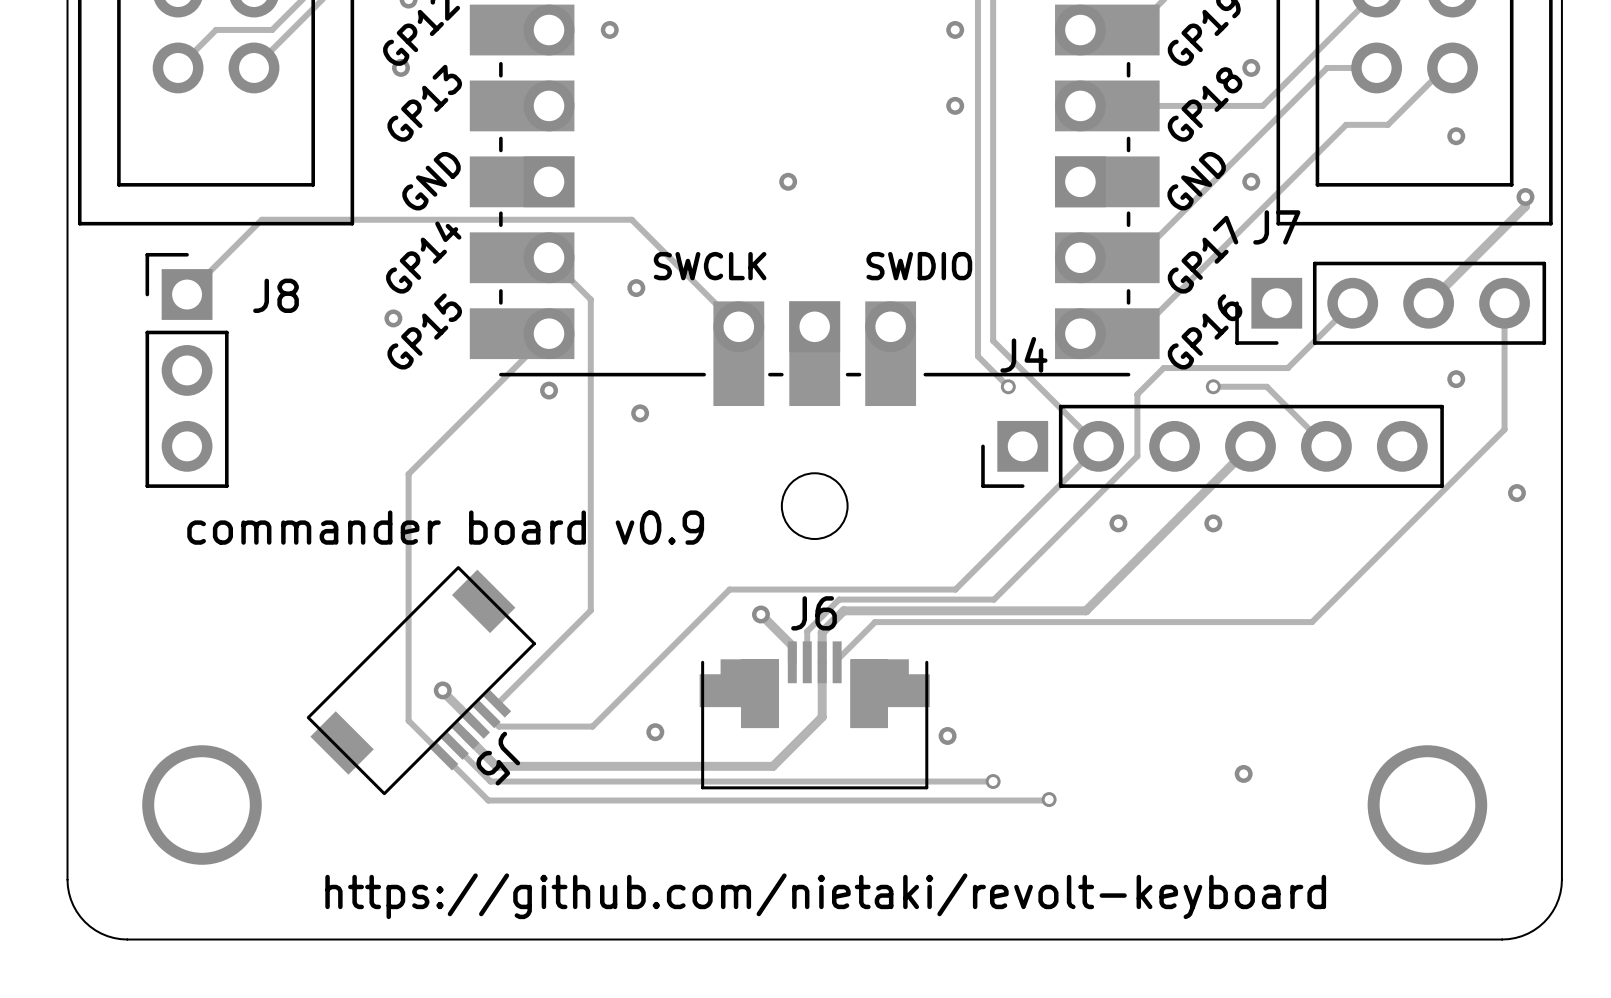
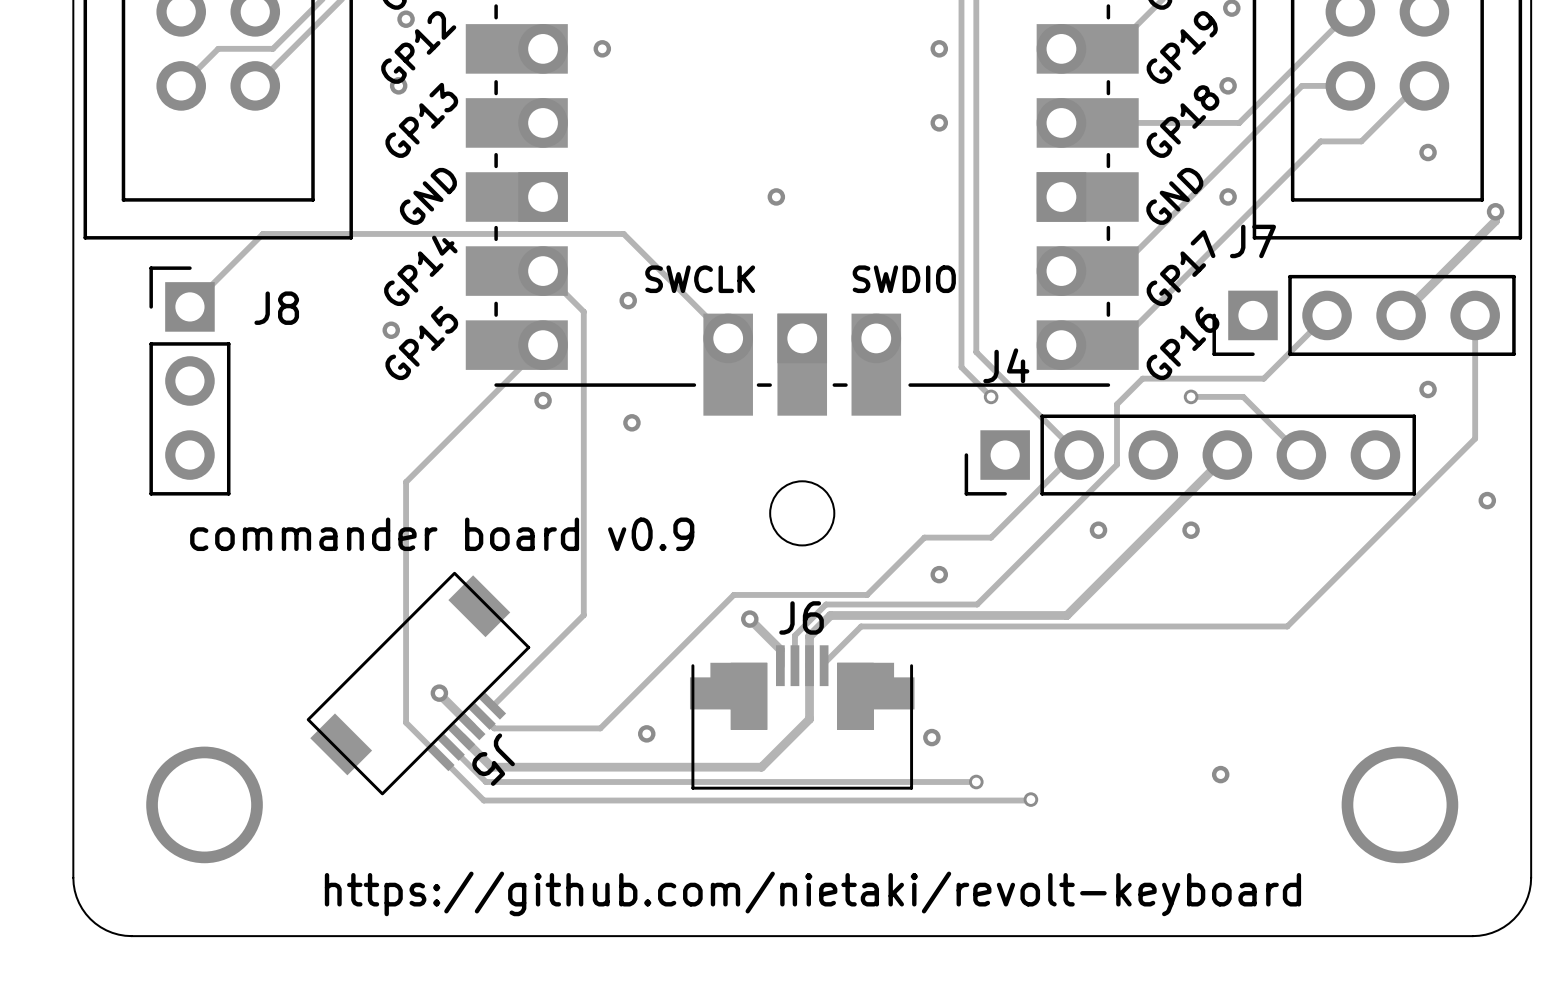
track: (1098, 446) (955, 589) (729, 589) (592, 726) -> (1079, 455) (1073, 455) (991, 537) (924, 537) (867, 594) (733, 594) (600, 728) (585, 728)
via: none -> (939, 574)

